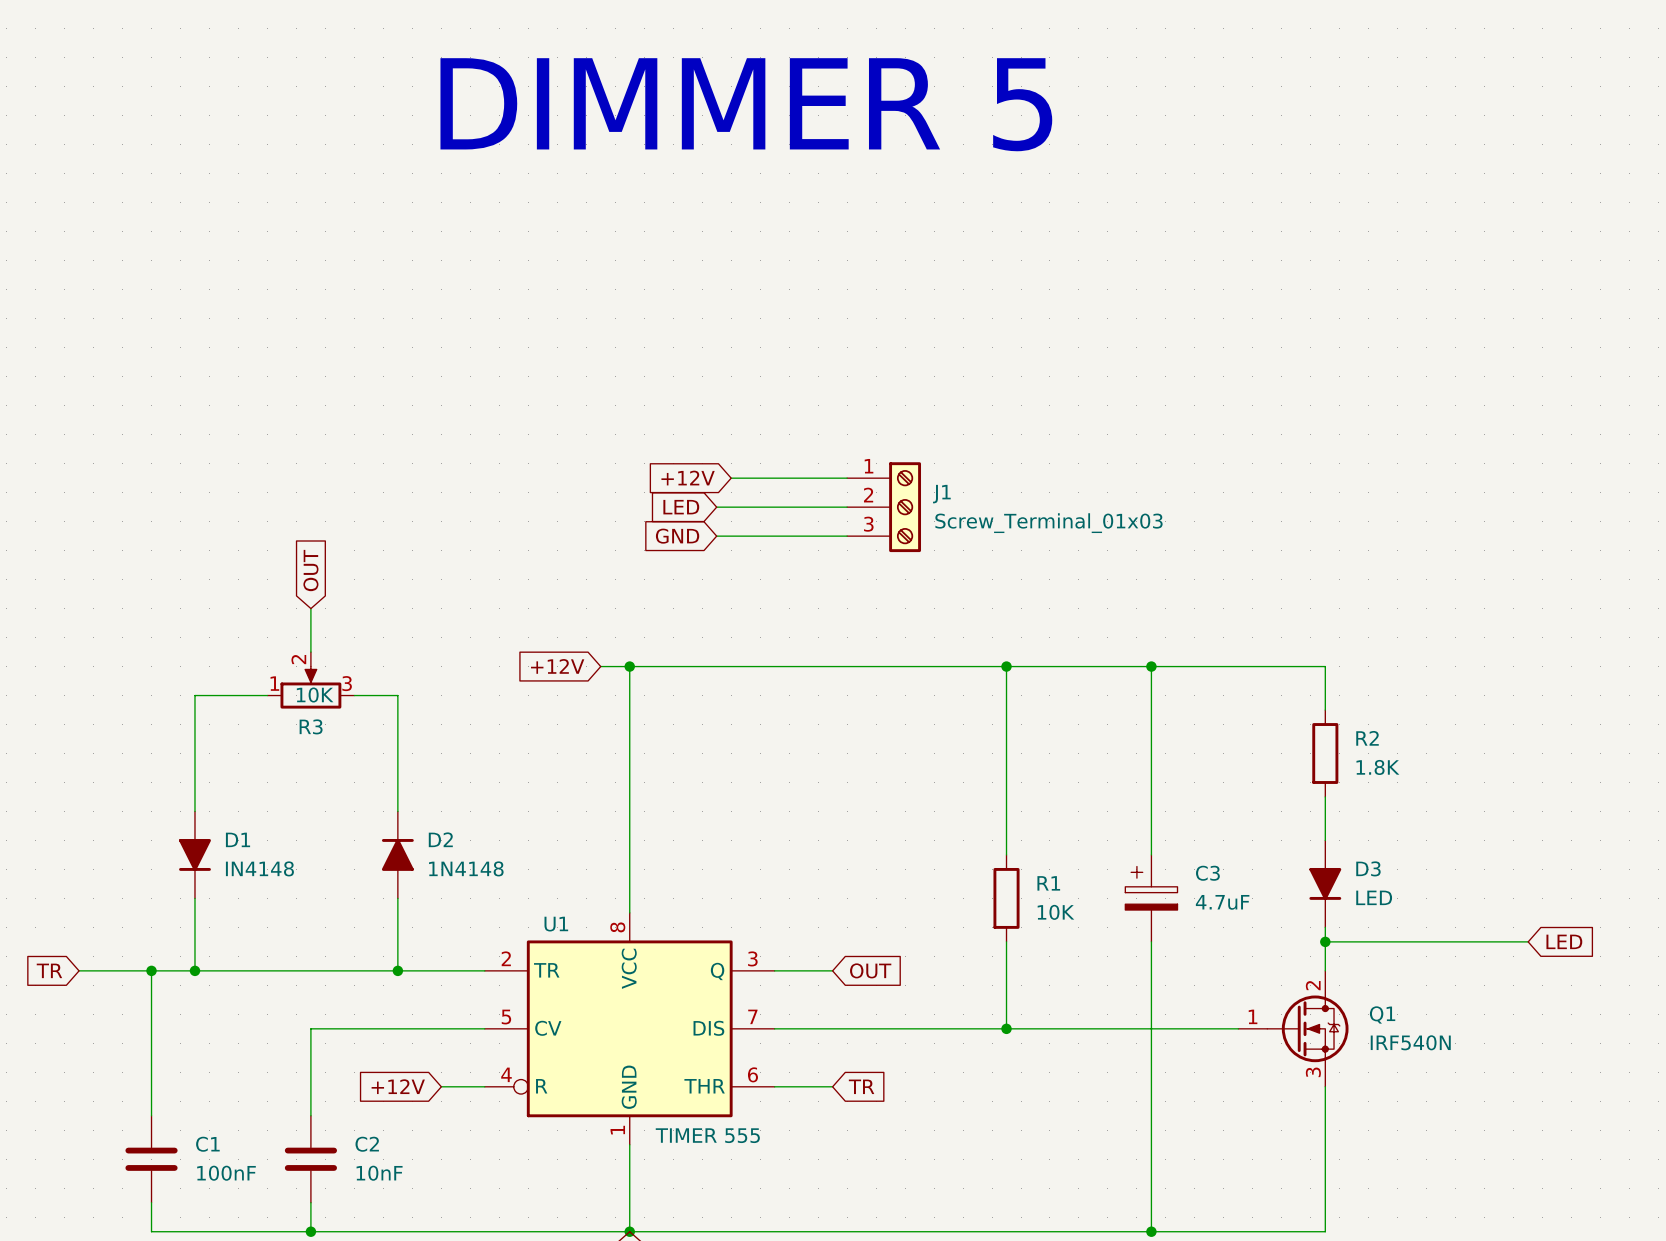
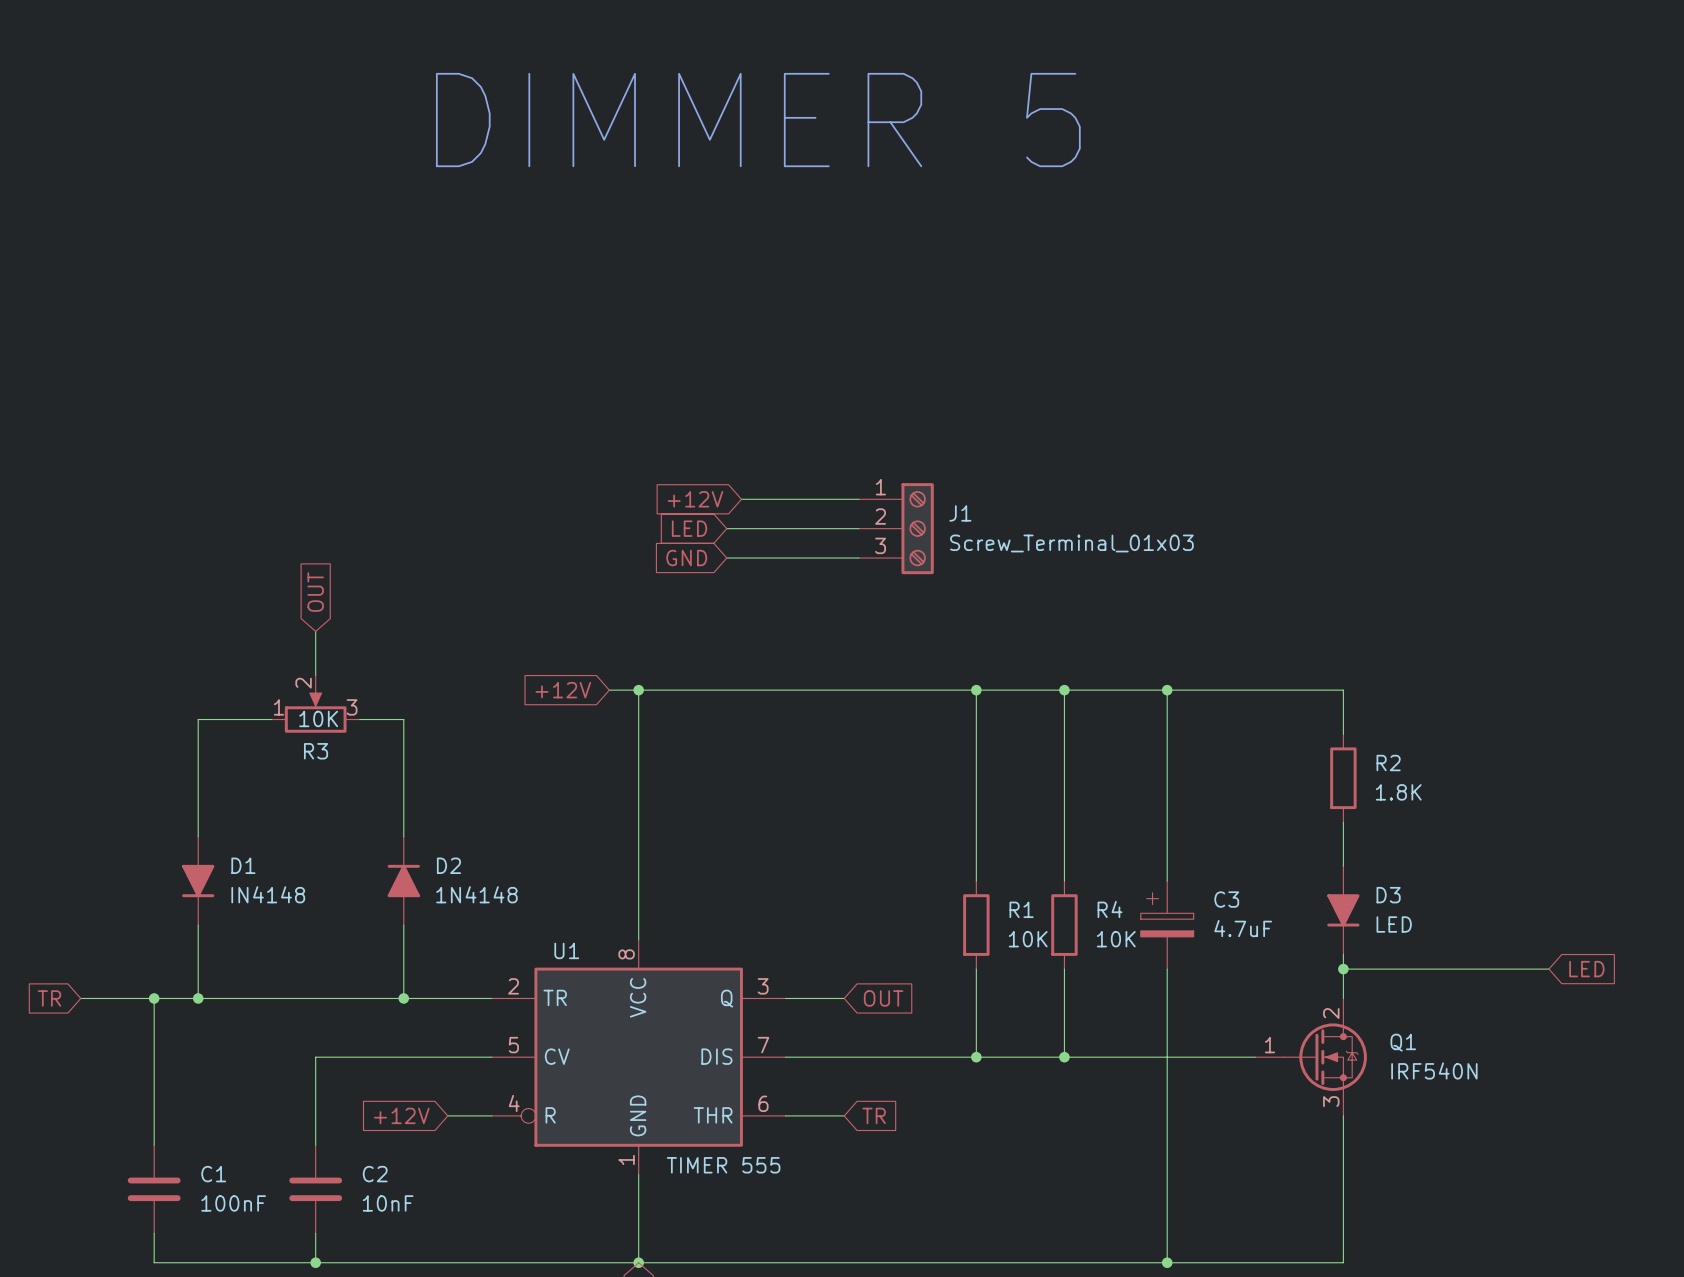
junction: none -> (976, 690)
wire: (1006, 666) (1006, 854) -> (976, 690) (976, 881)
junction: (1006, 666) -> none
wire: none -> (1064, 690) (1064, 881)
junction: none -> (1064, 690)
R1 position: (1006, 898) -> (976, 925)
R4: none -> 10K (1064, 925)
wire: (1006, 941) (1006, 1028) -> (976, 969) (976, 1057)
wire: none -> (1064, 969) (1064, 1057)
junction: none -> (976, 1057)
junction: (1006, 1028) -> none
junction: none -> (1064, 1057)

